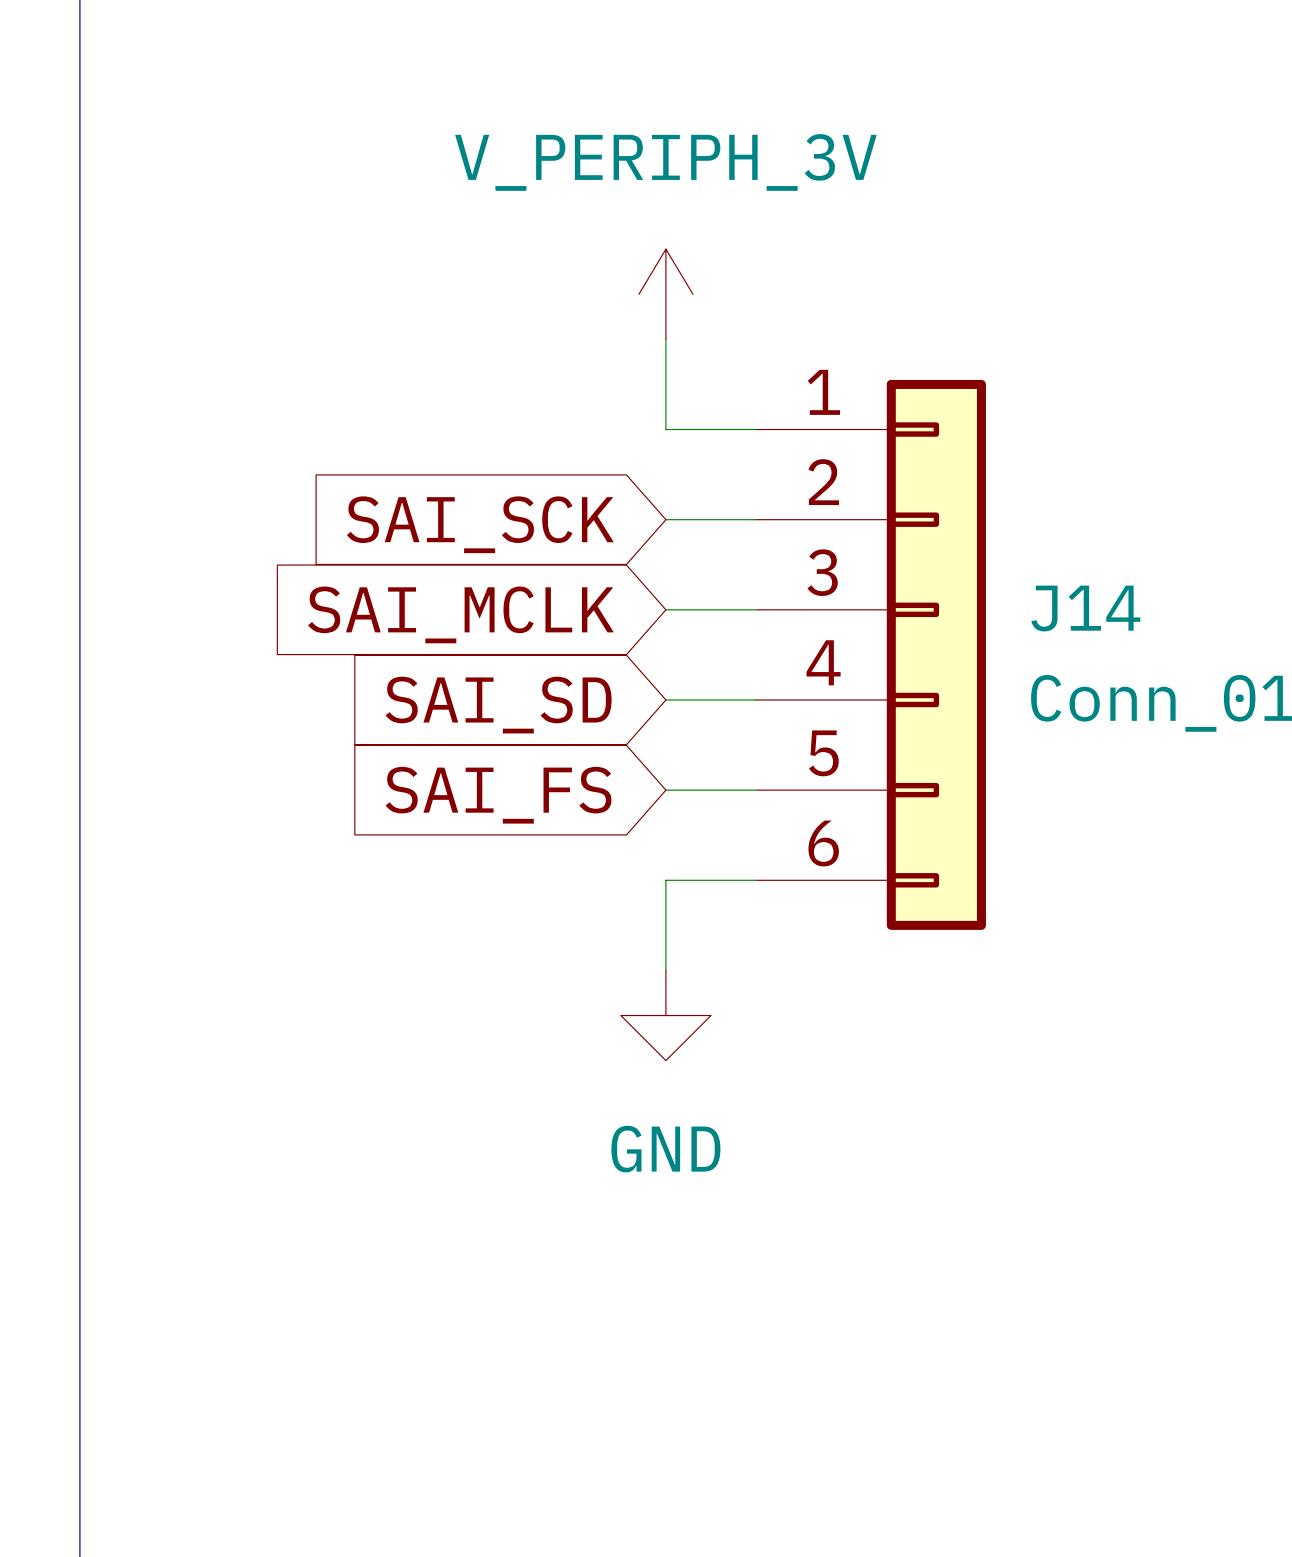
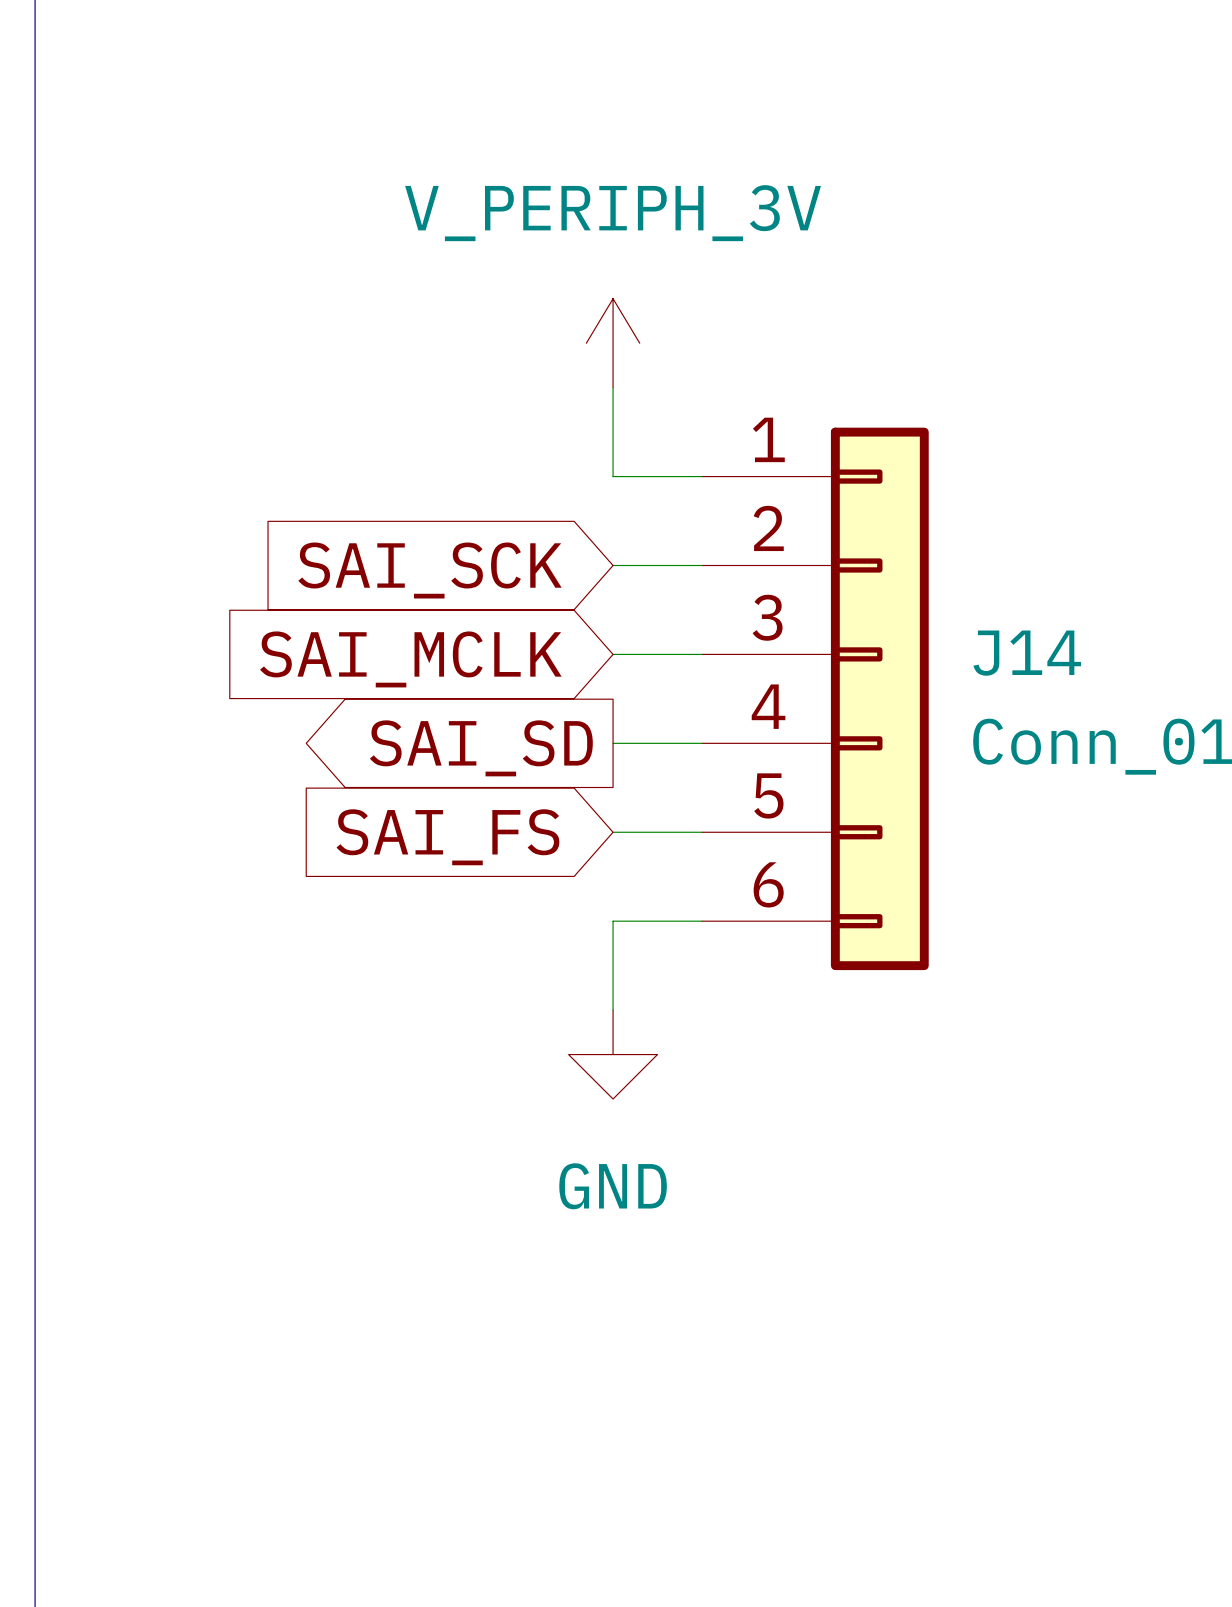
global label shape: input (498, 705) -> output (481, 748)

